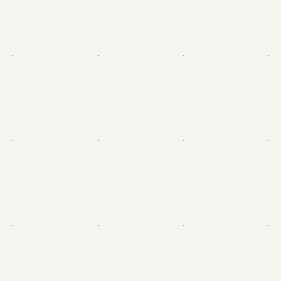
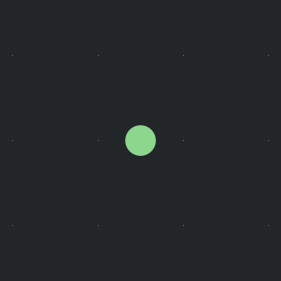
junction: none -> (140, 140)

